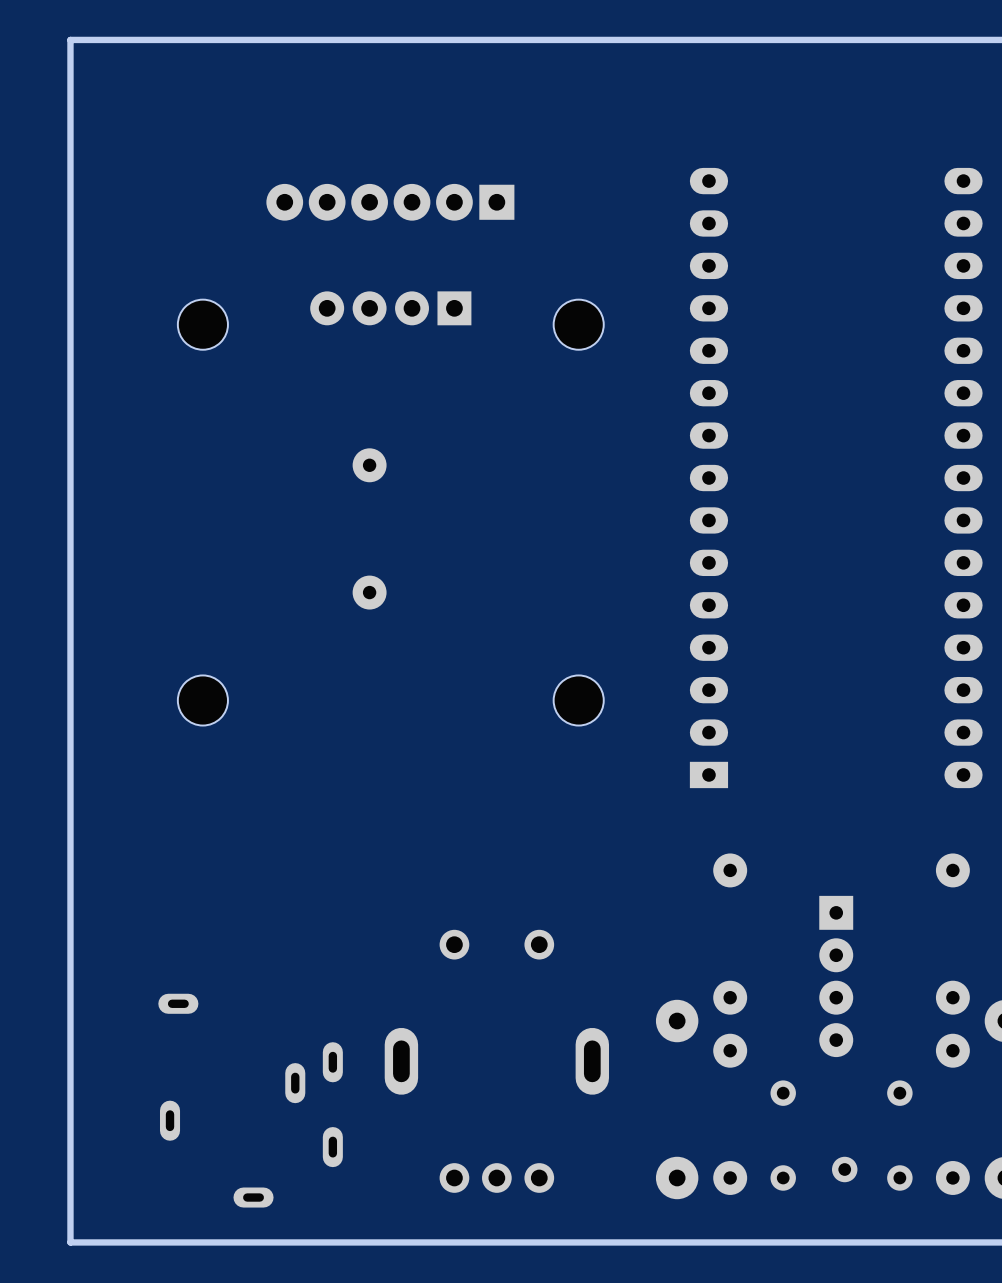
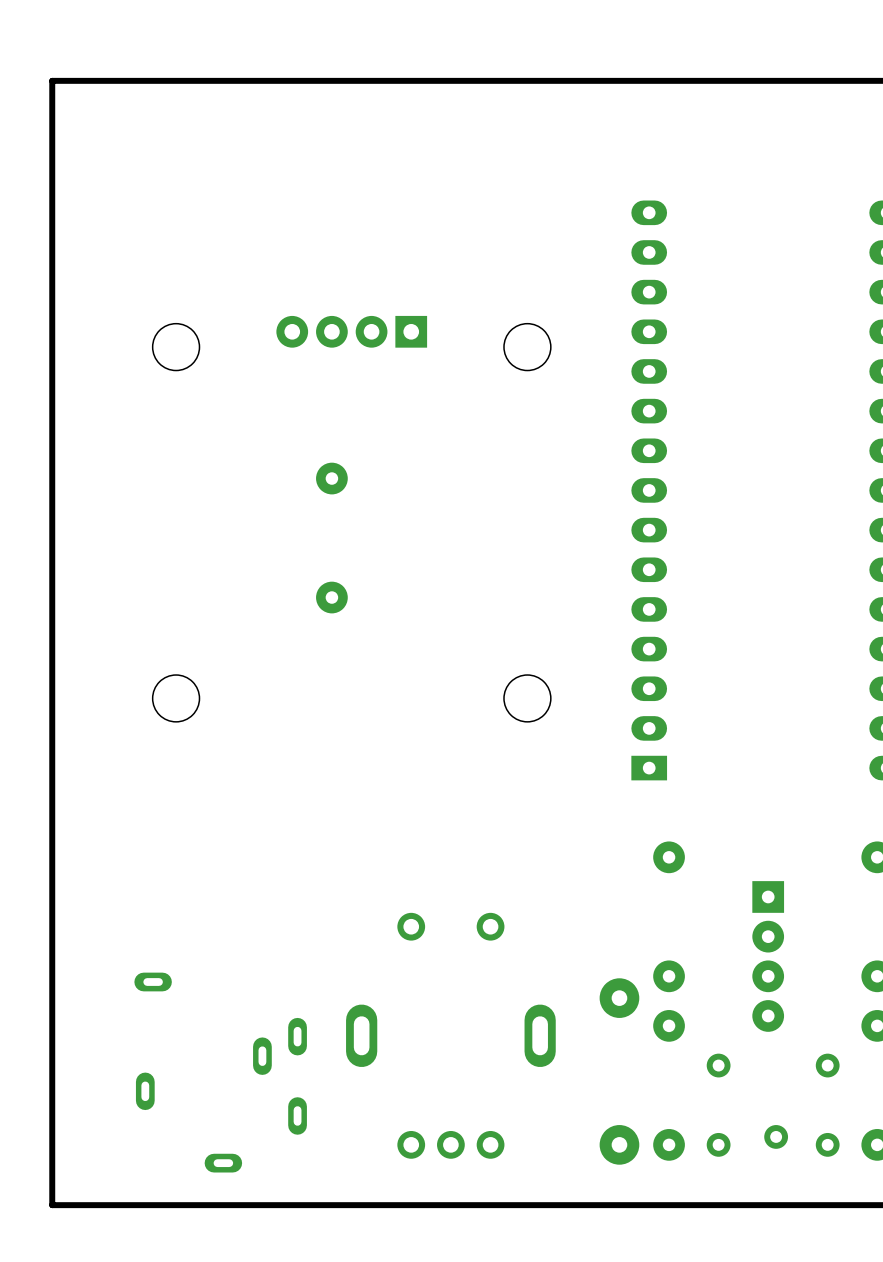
part: (390, 202) -> none

